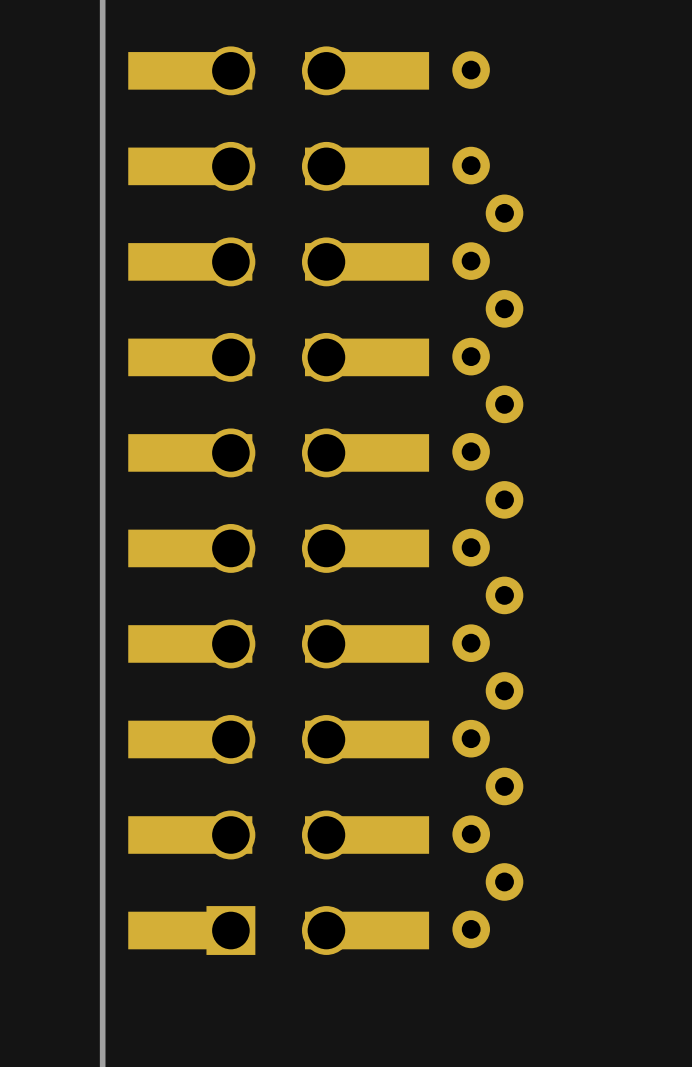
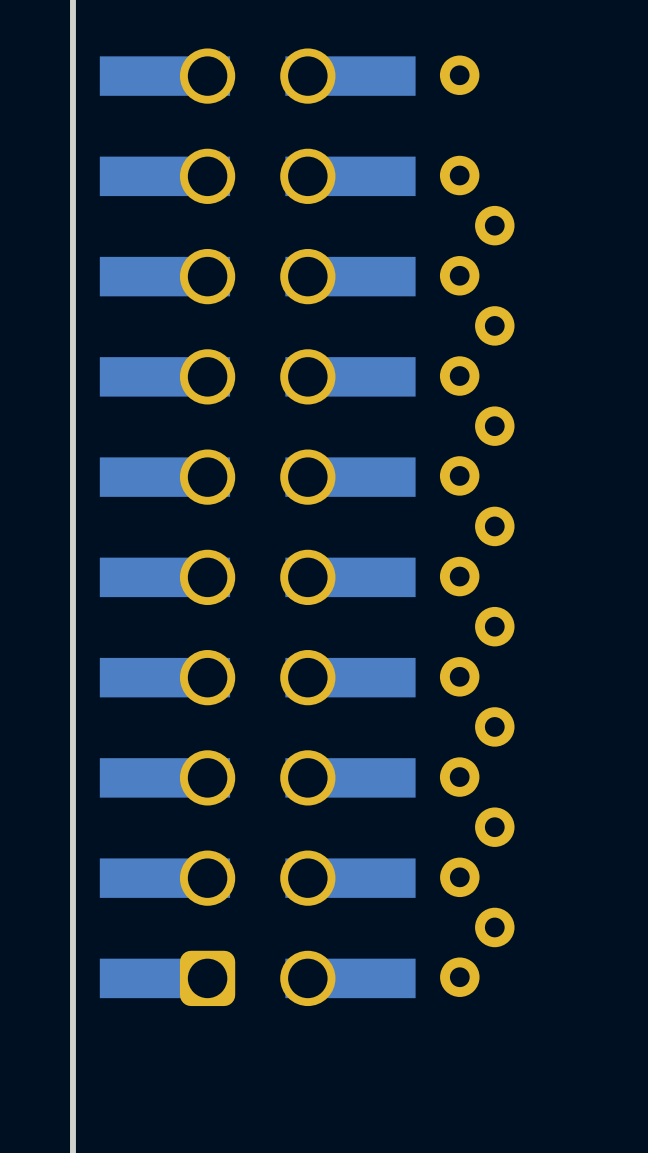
part footprint: [128, 46, 430, 955] -> [99, 48, 416, 1007]

